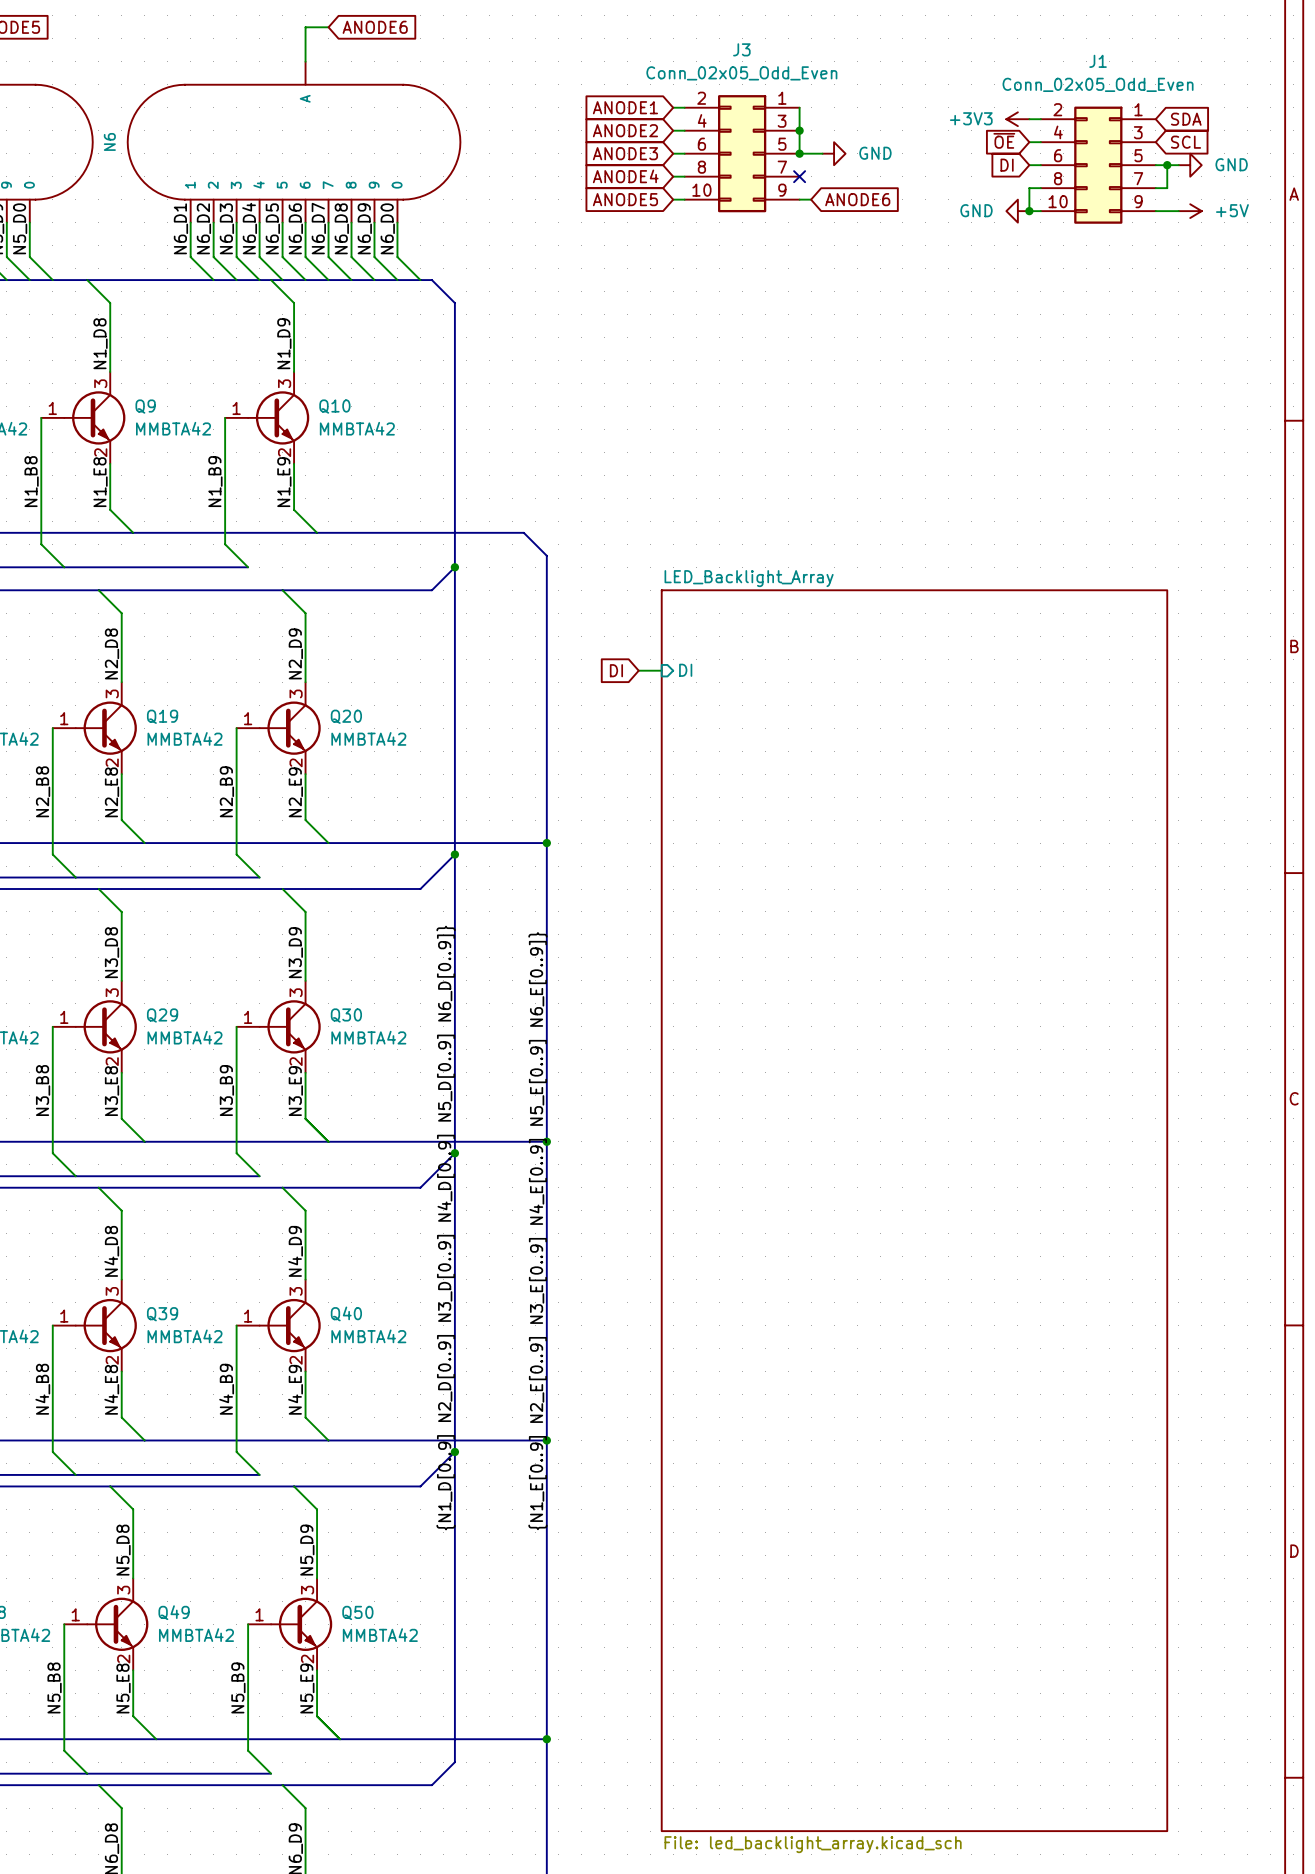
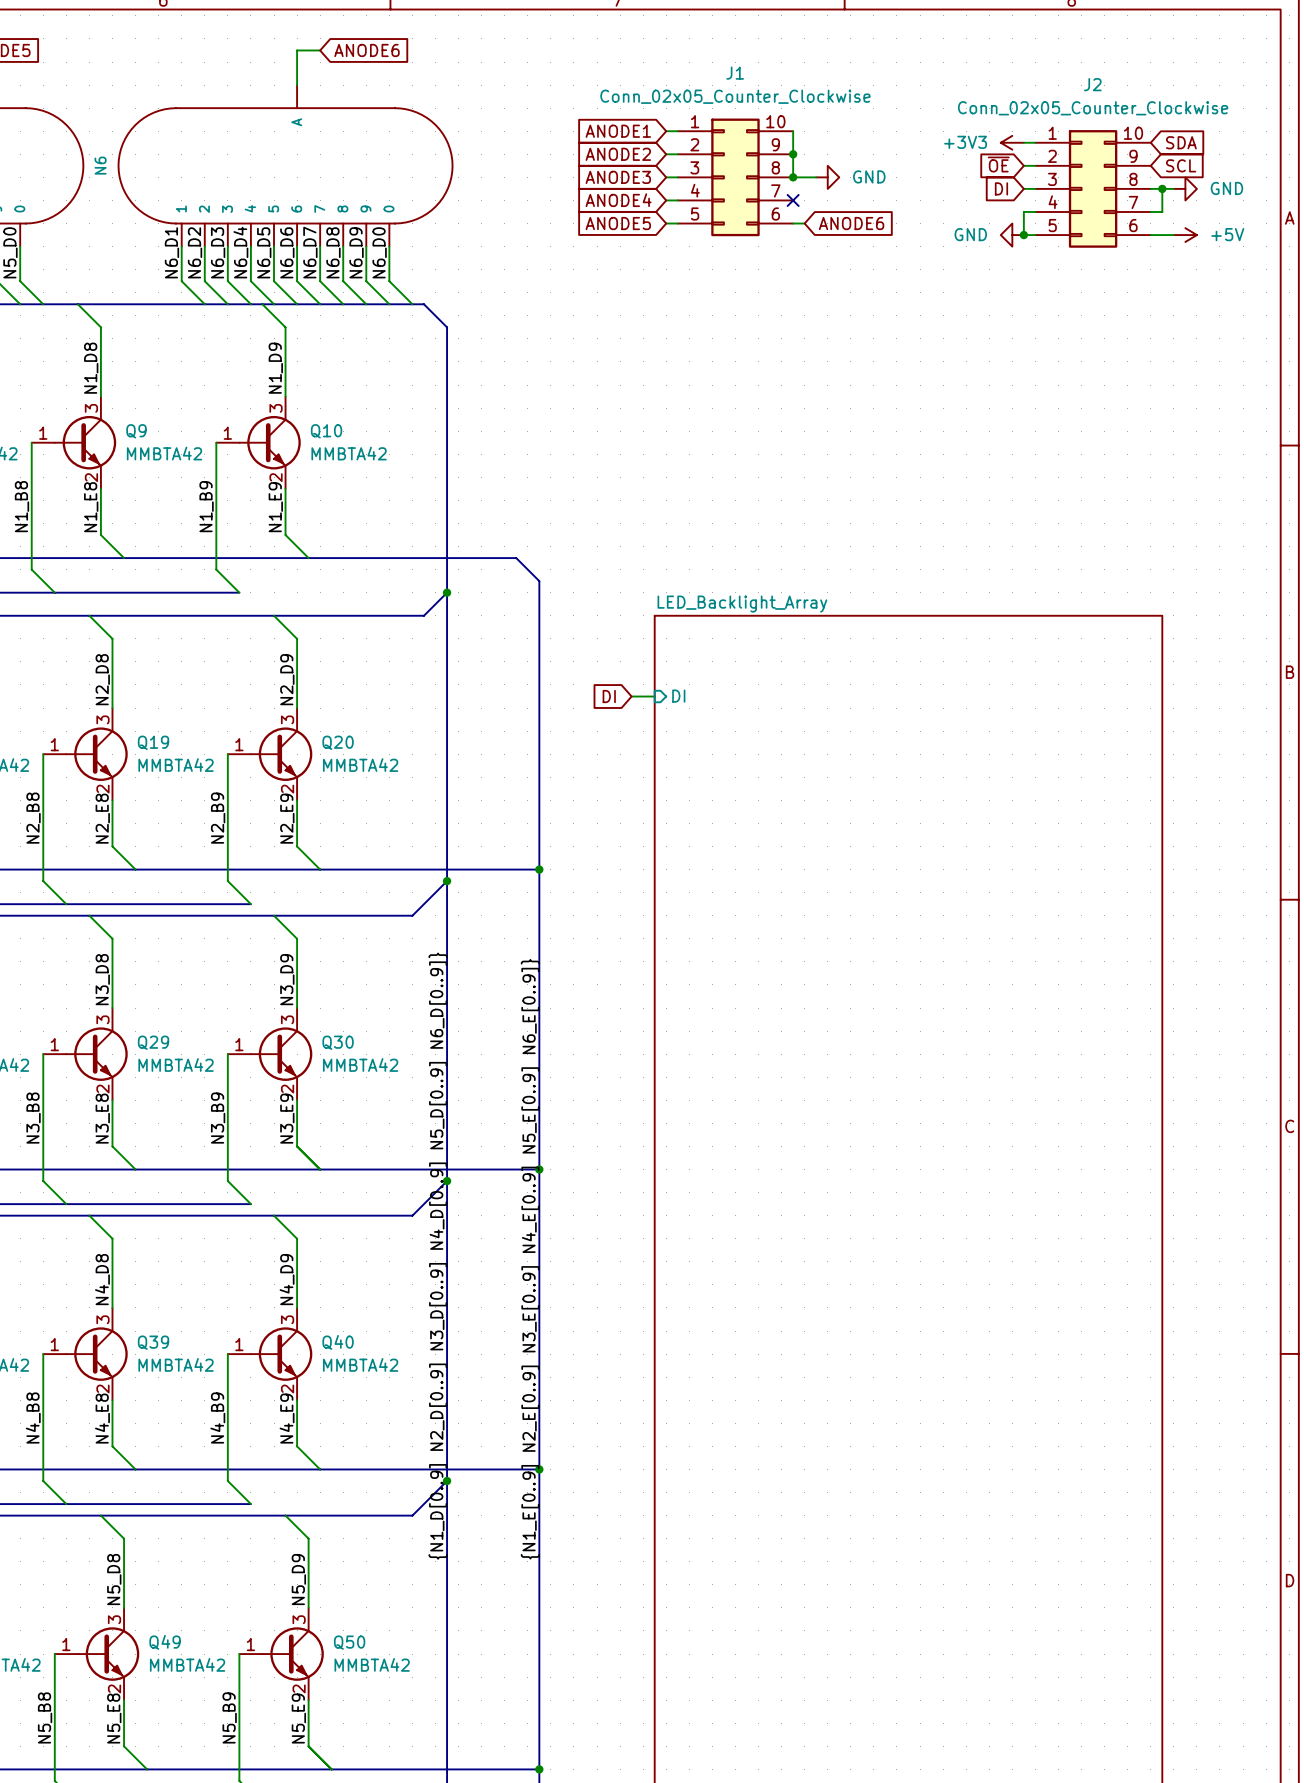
J1 value: Conn_02x05_Odd_Even (1098, 84) -> Conn_02x05_Counter_Clockwise (735, 96)
J1 symbol: [1040, 106, 1156, 224] -> [677, 118, 794, 237]
J3: Conn_02x05_Odd_Even (742, 153) -> none
J2: none -> Conn_02x05_Counter_Clockwise (1093, 188)

